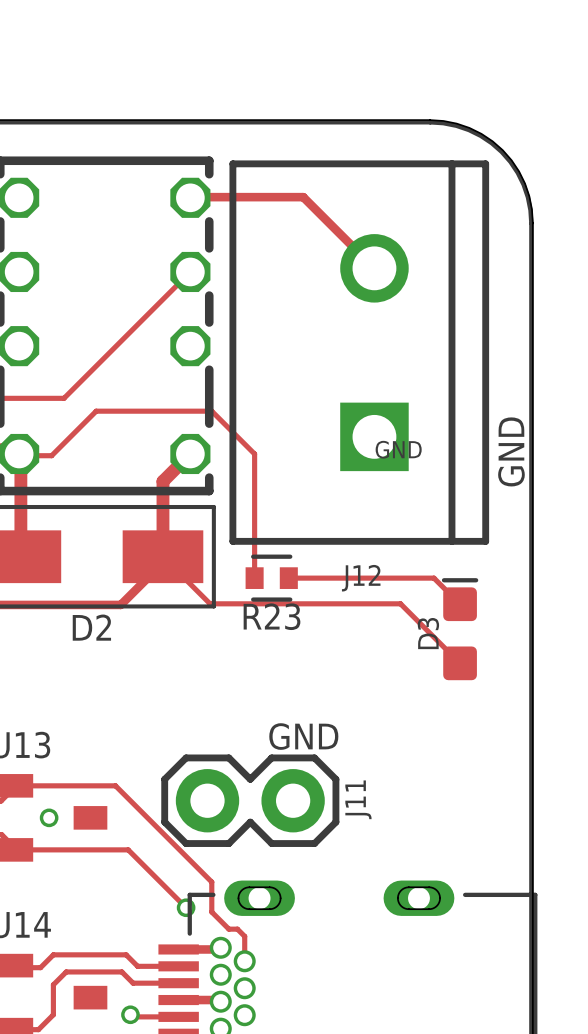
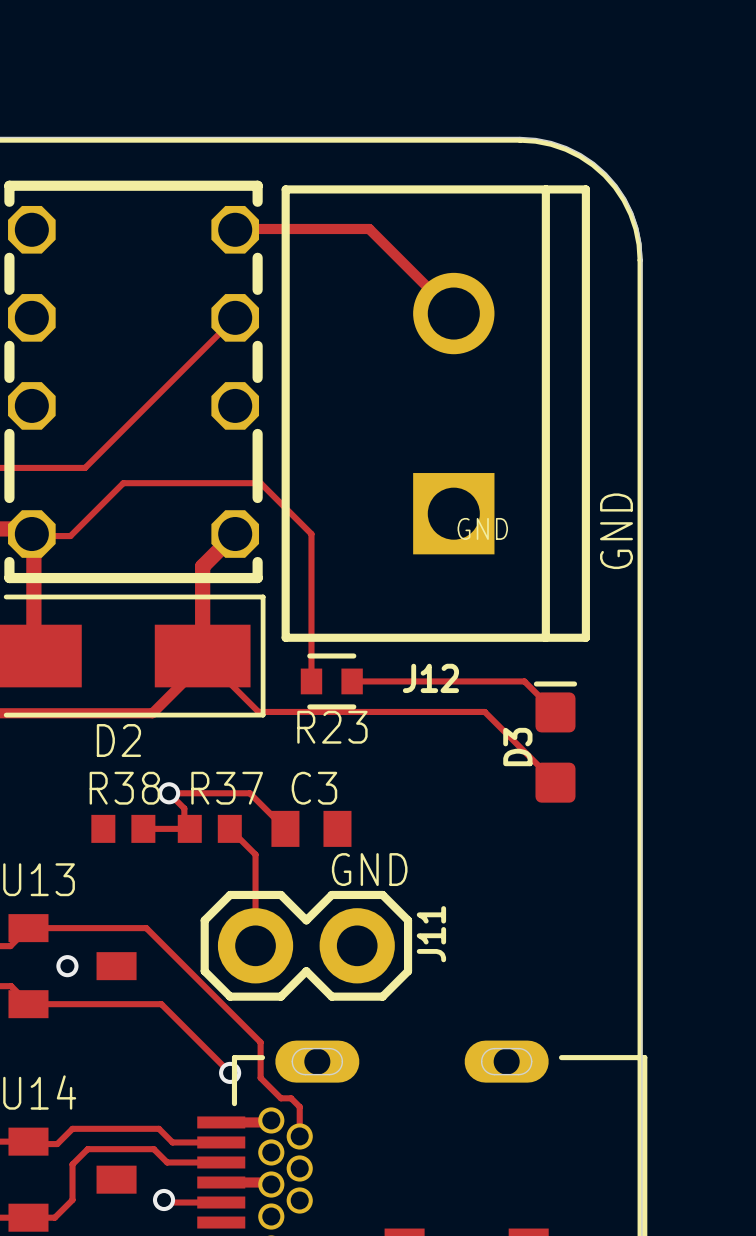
via: none -> (169, 793)
R38: none -> (123, 828)
track: none -> (143, 828) (189, 828)
track: none -> (184, 828) (184, 808) (169, 793) (249, 793) (285, 828)
R37: none -> (209, 828)
track: none -> (229, 828) (255, 854) (255, 945)
C3: none -> (311, 828)

